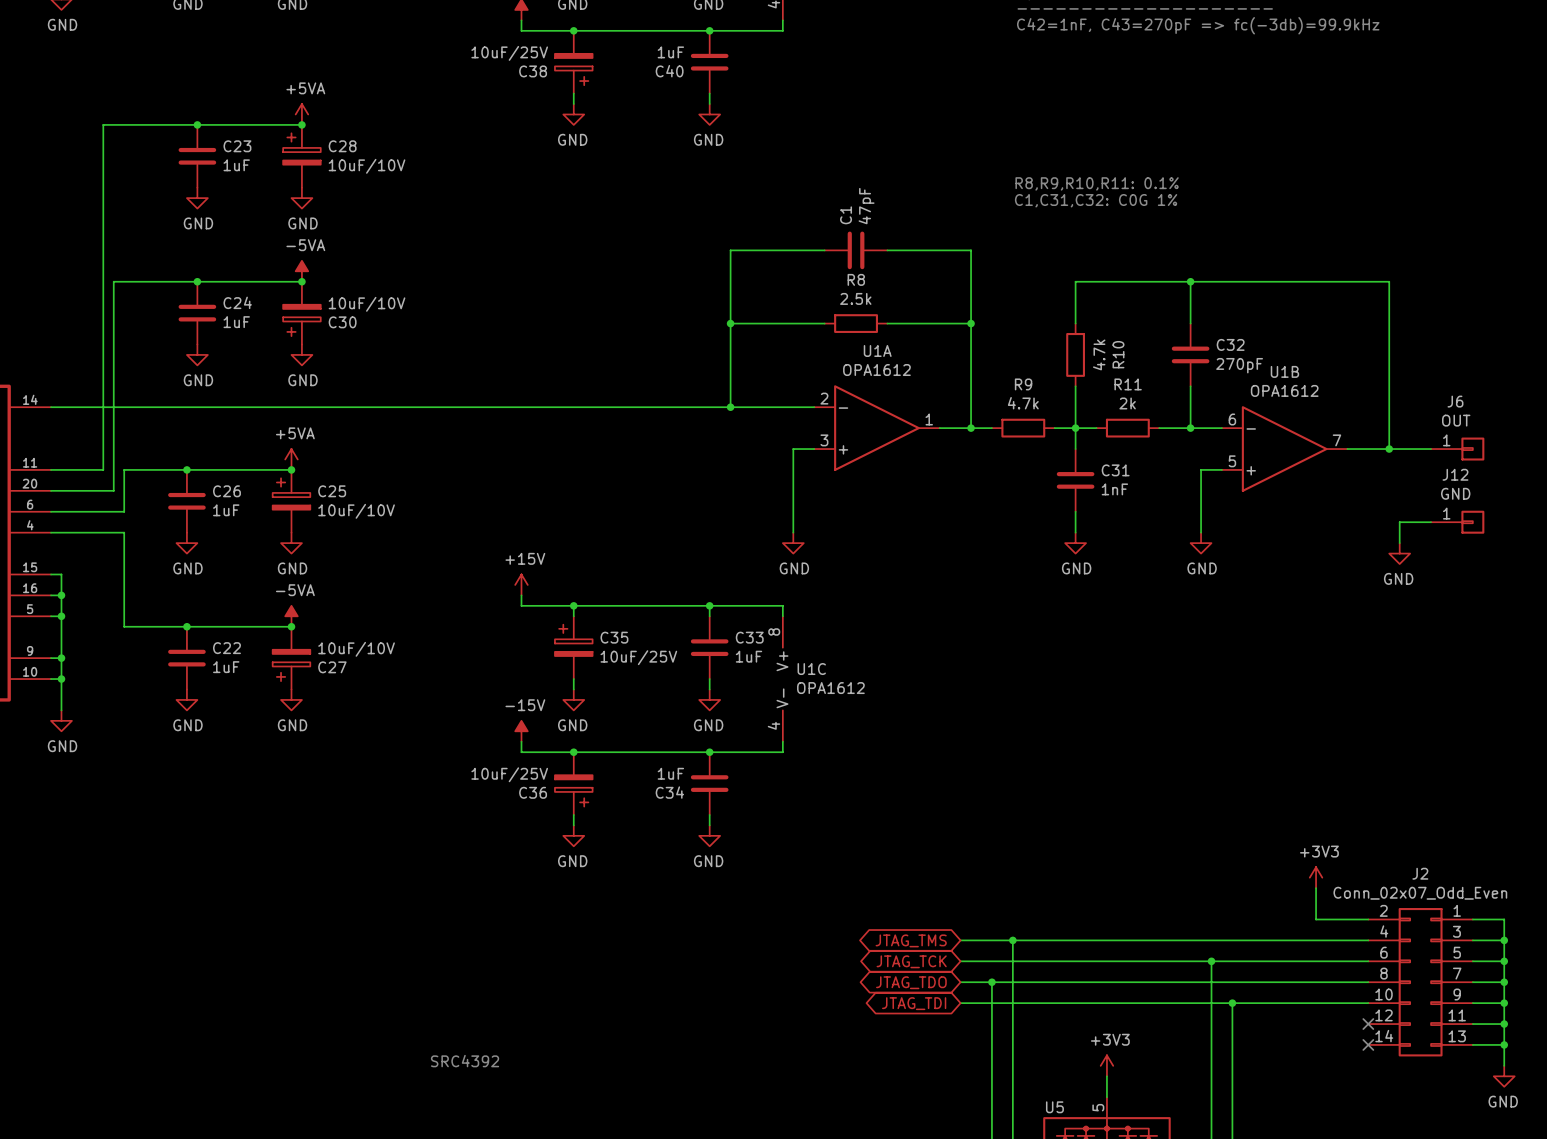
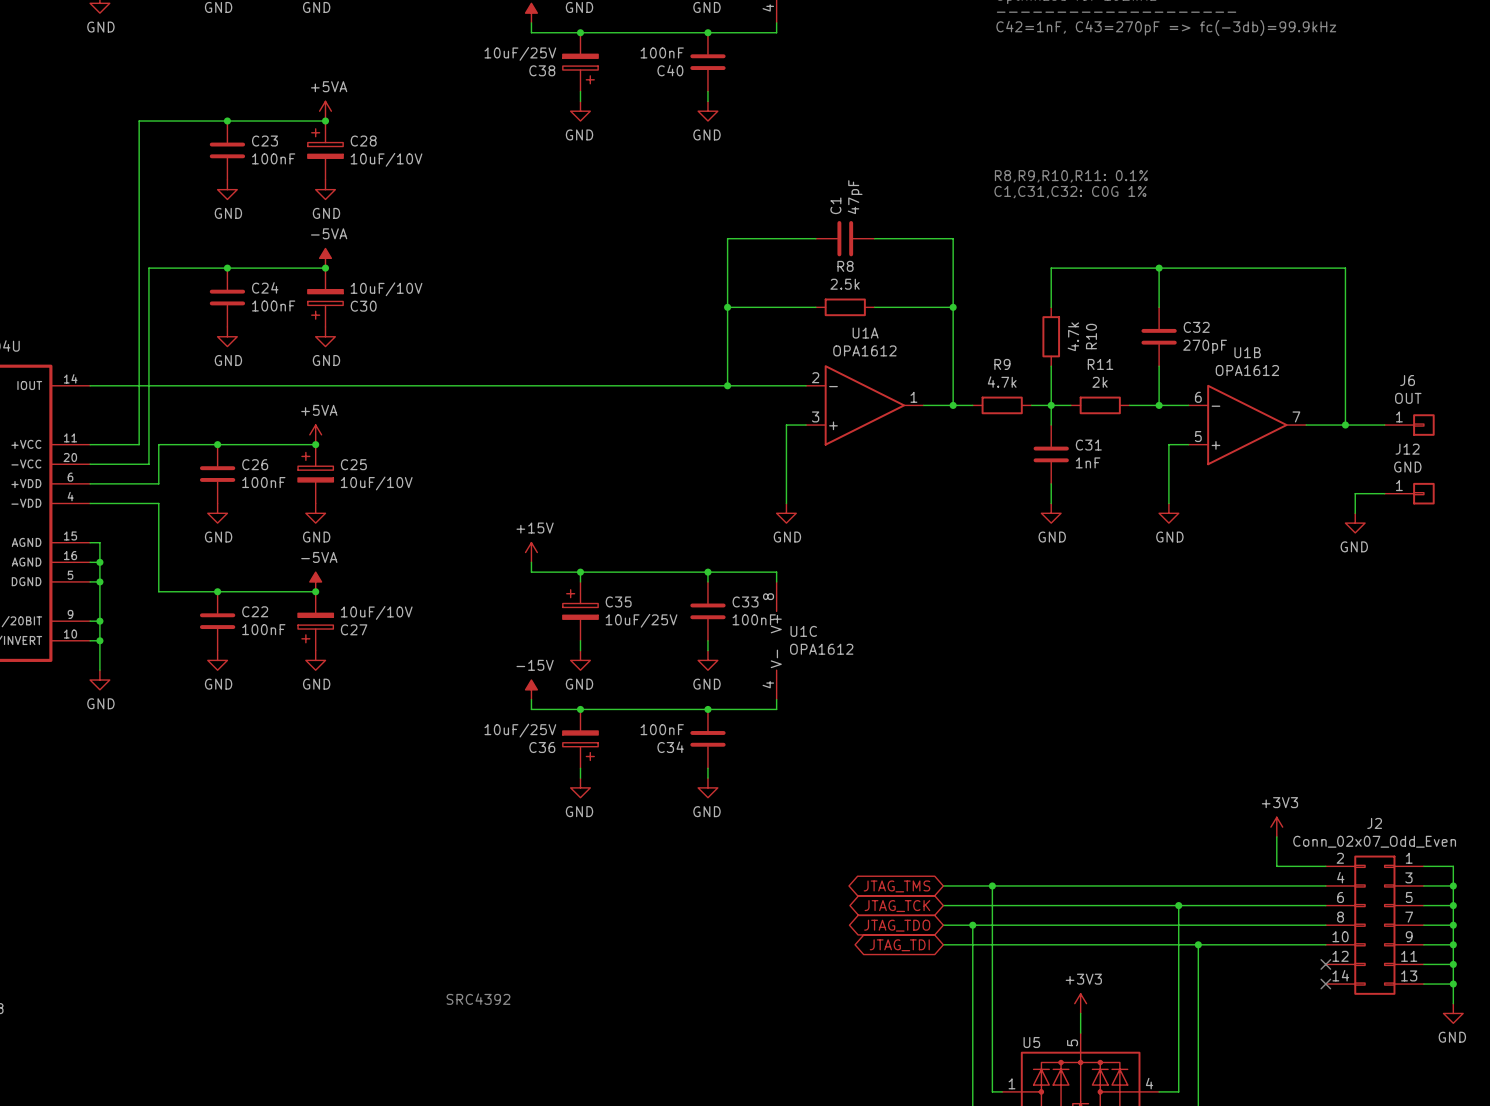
C40 value: 1uF (670, 52) -> 100nF (662, 52)
C23 value: 1uF (236, 165) -> 100nF (273, 158)
C24 value: 1uF (236, 322) -> 100nF (273, 305)
C26 value: 1uF (226, 510) -> 100nF (263, 482)
C33 value: 1uF (748, 656) -> 100nF (754, 619)
C22 value: 1uF (226, 667) -> 100nF (263, 629)
C34 value: 1uF (670, 773) -> 100nF (662, 729)

